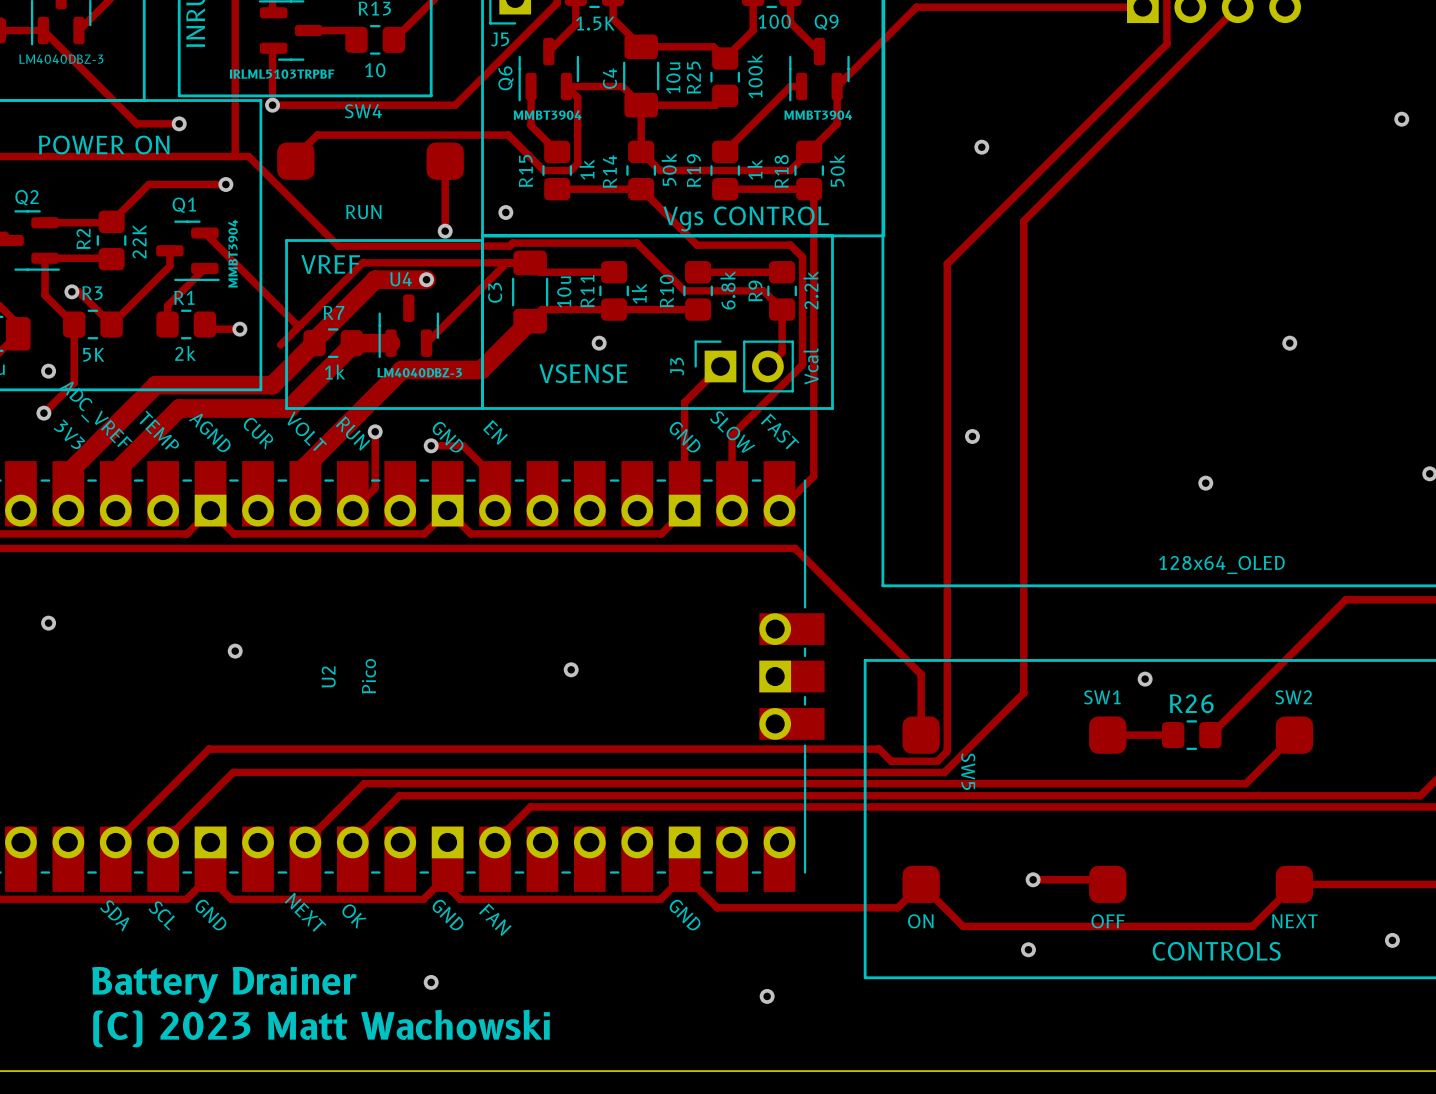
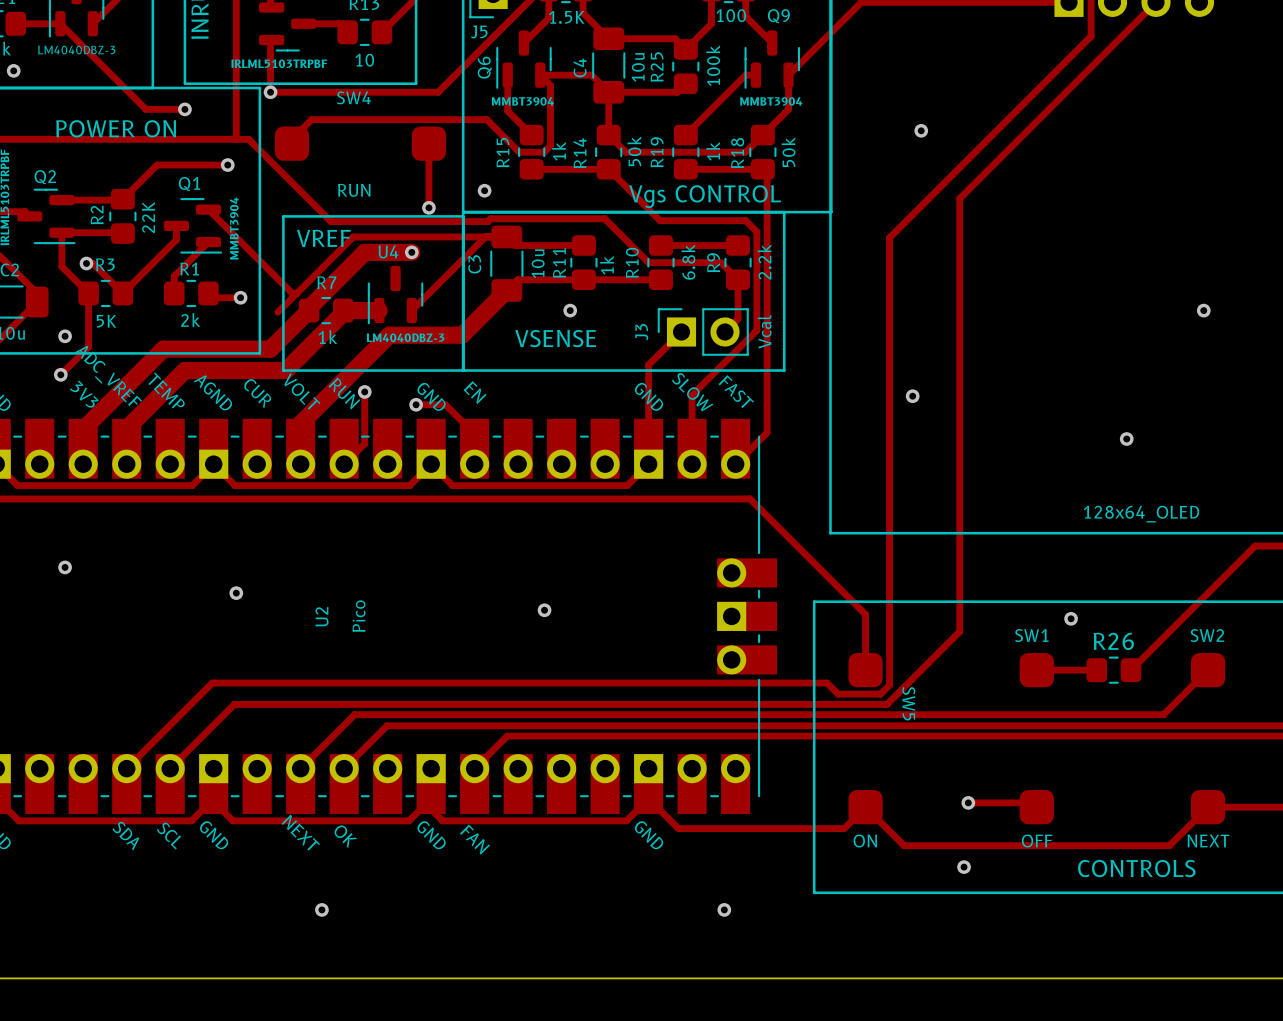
via position: (431, 982) -> (321, 909)
text: Battery Drainer (224, 985) -> none
text: (C) 2023 Matt Wachowski (321, 1028) -> none

